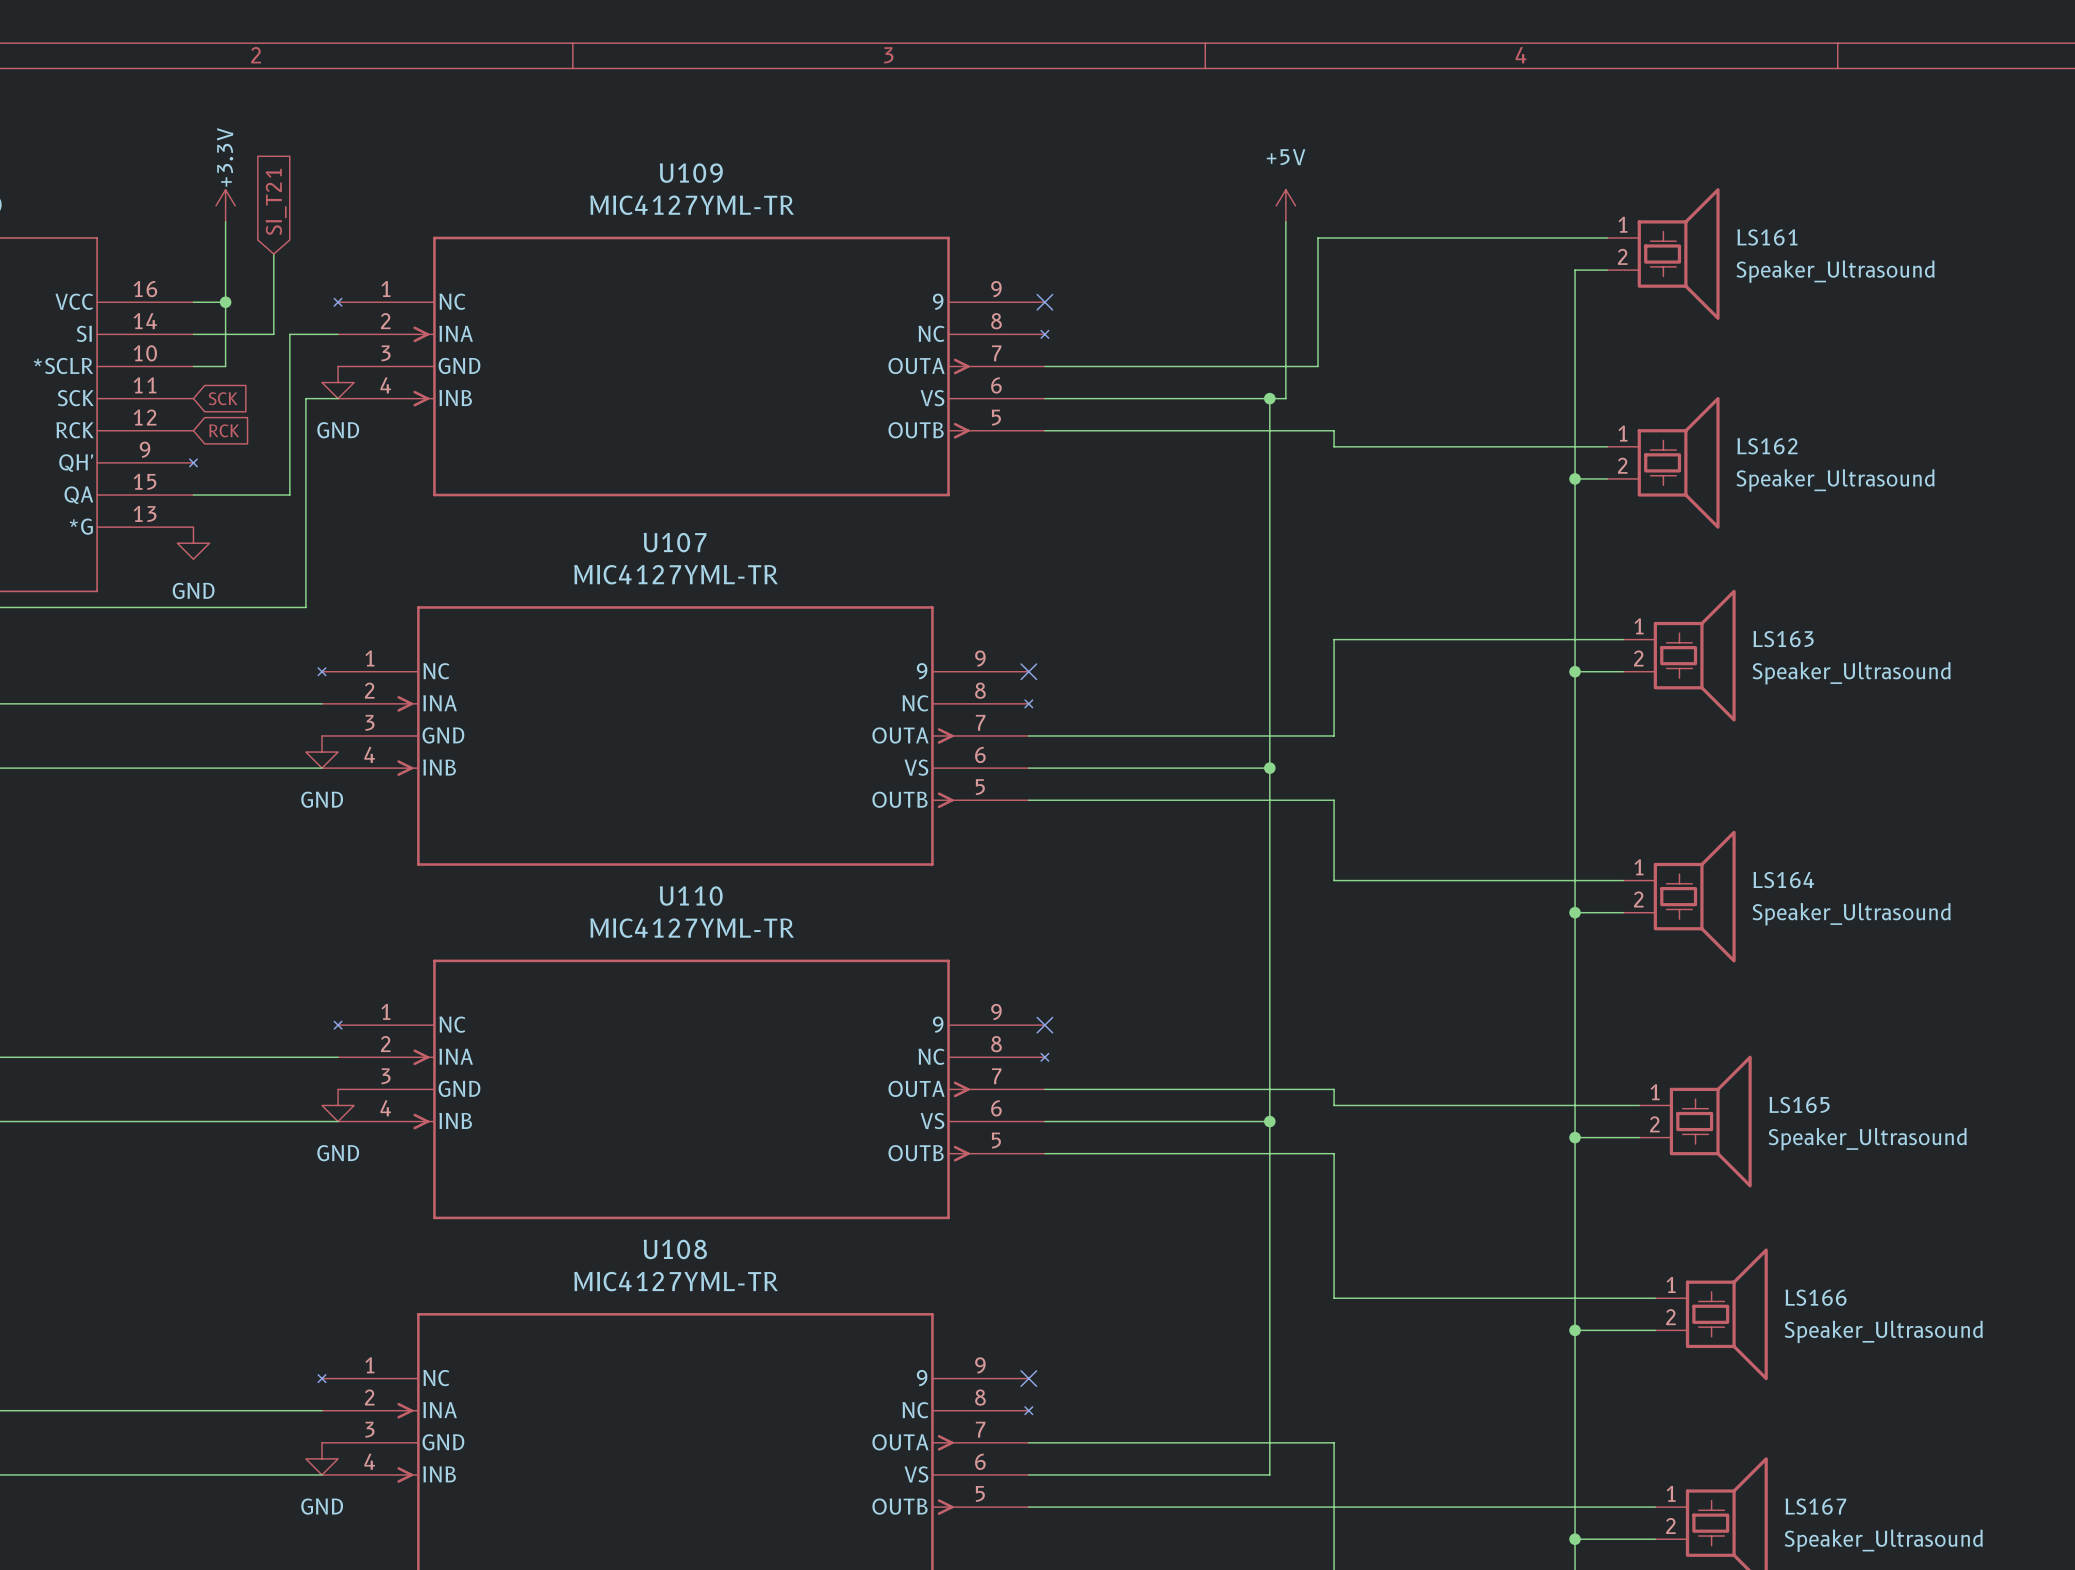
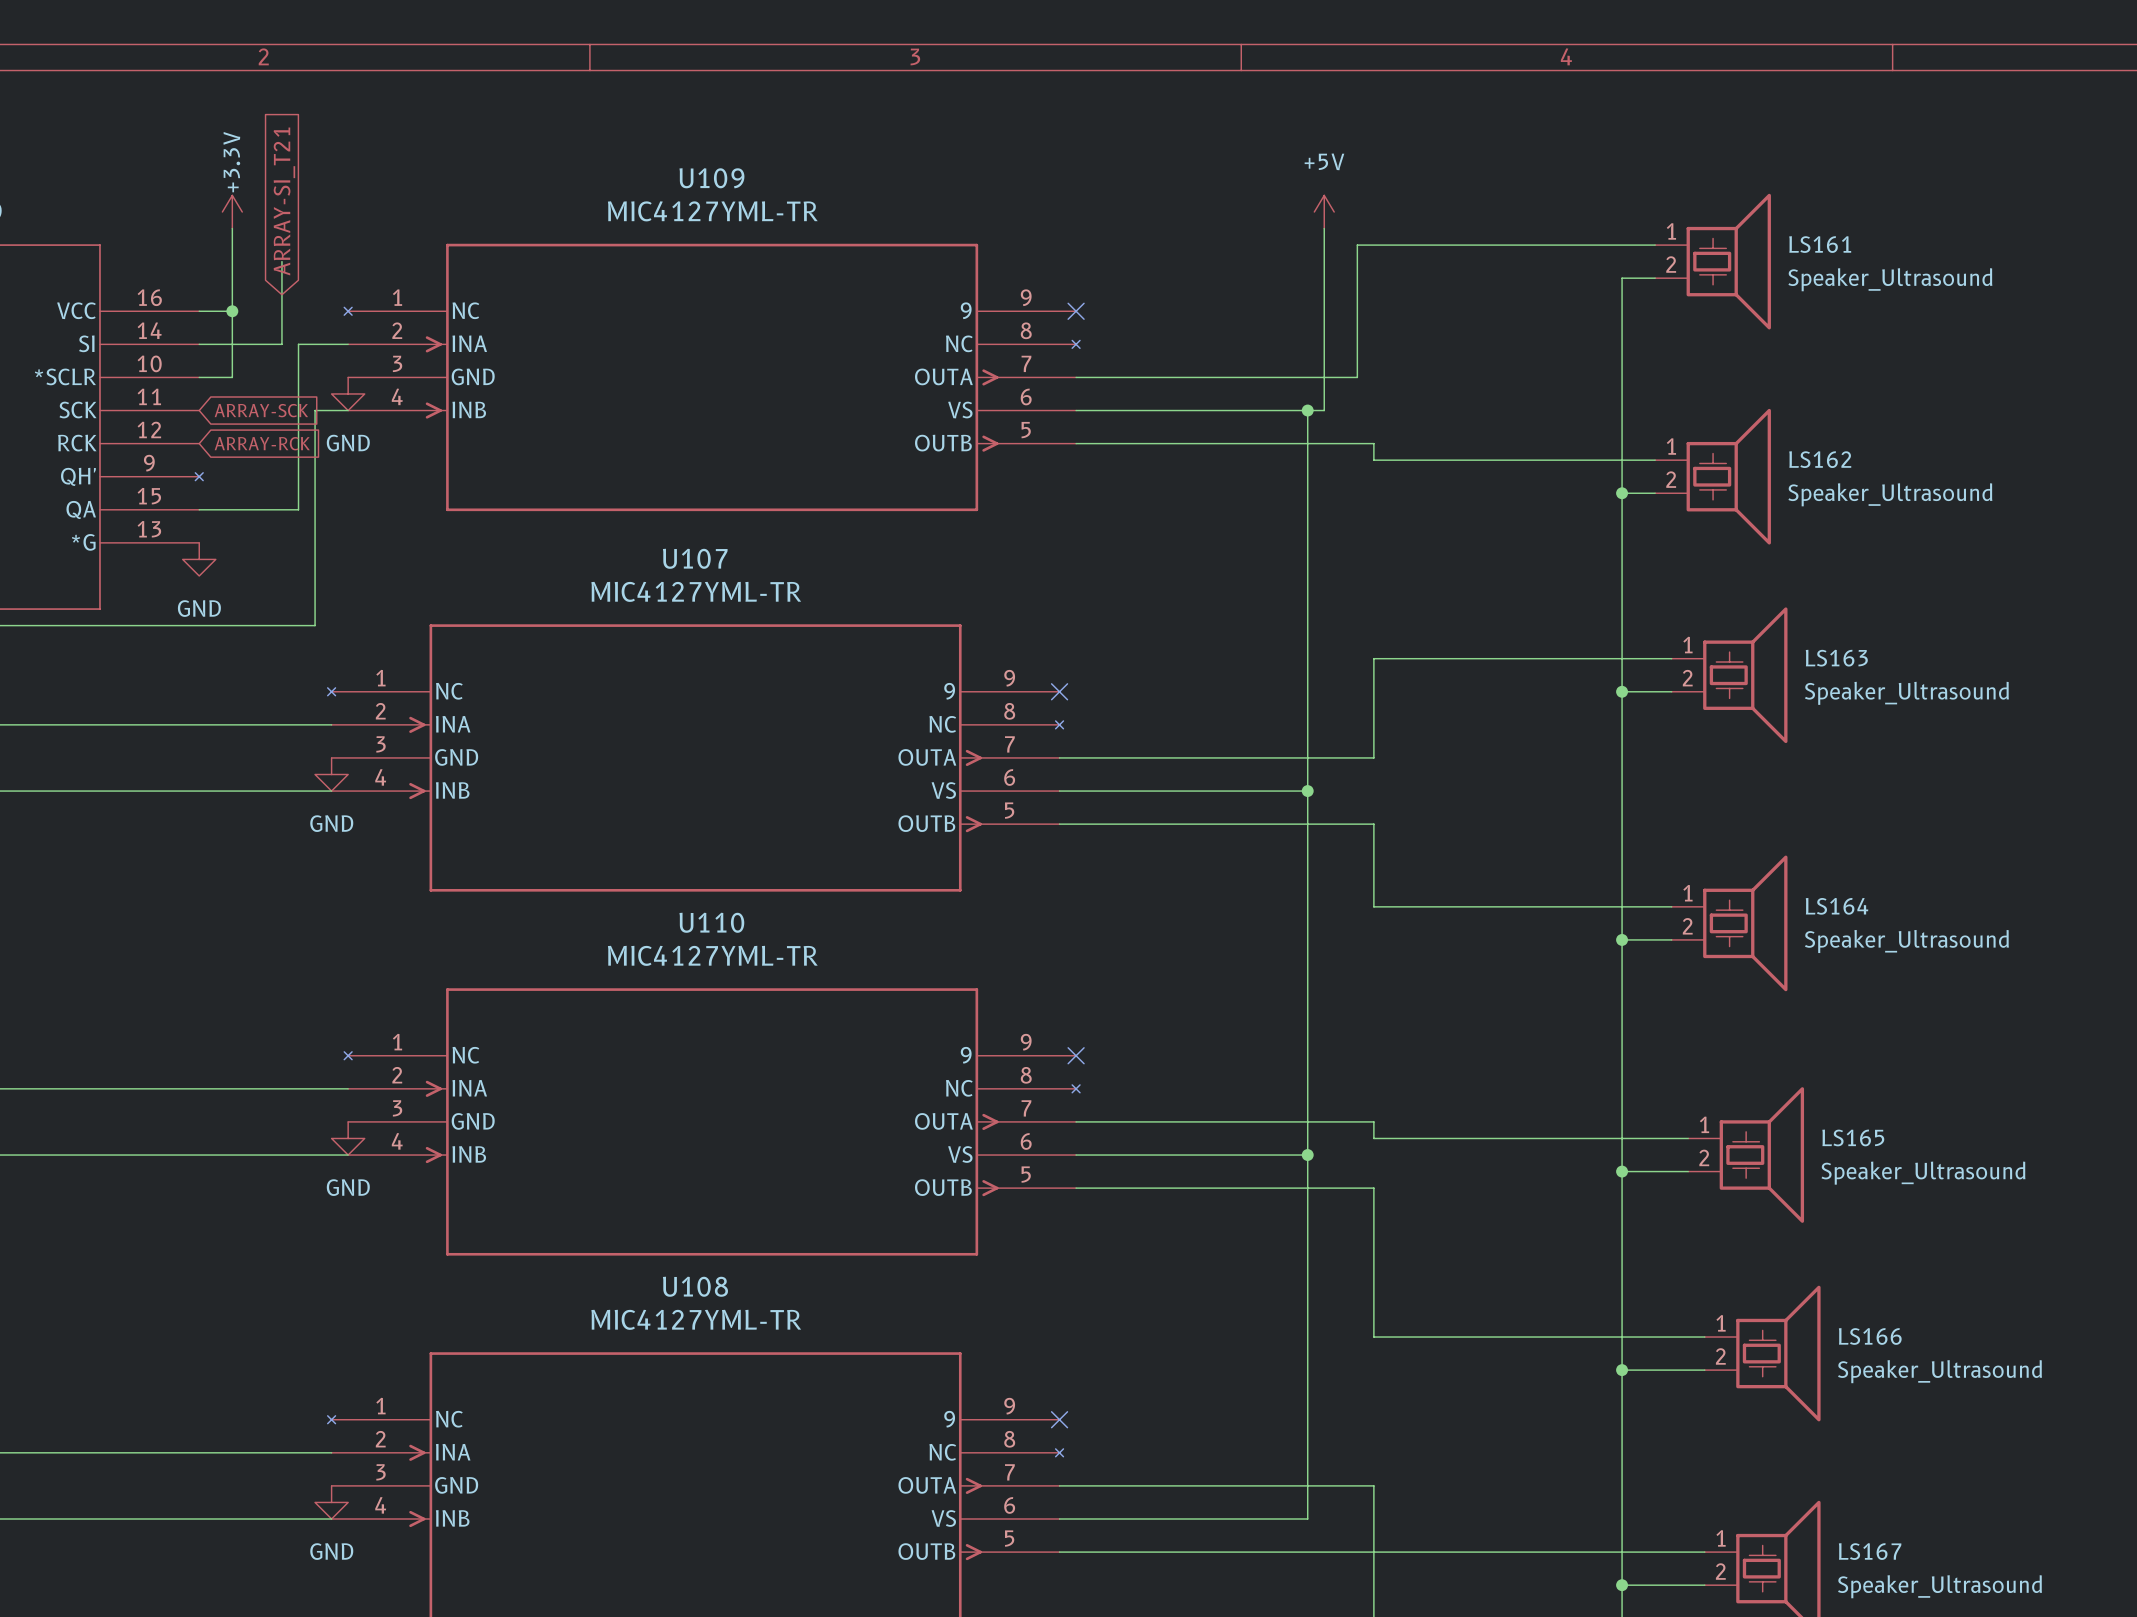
global label: SI_T21 (276, 201) -> ARRAY-SI_T21 (284, 201)
global label: SCK (223, 398) -> ARRAY-SCK (261, 410)
global label: RCK (224, 430) -> ARRAY-RCK (262, 443)

